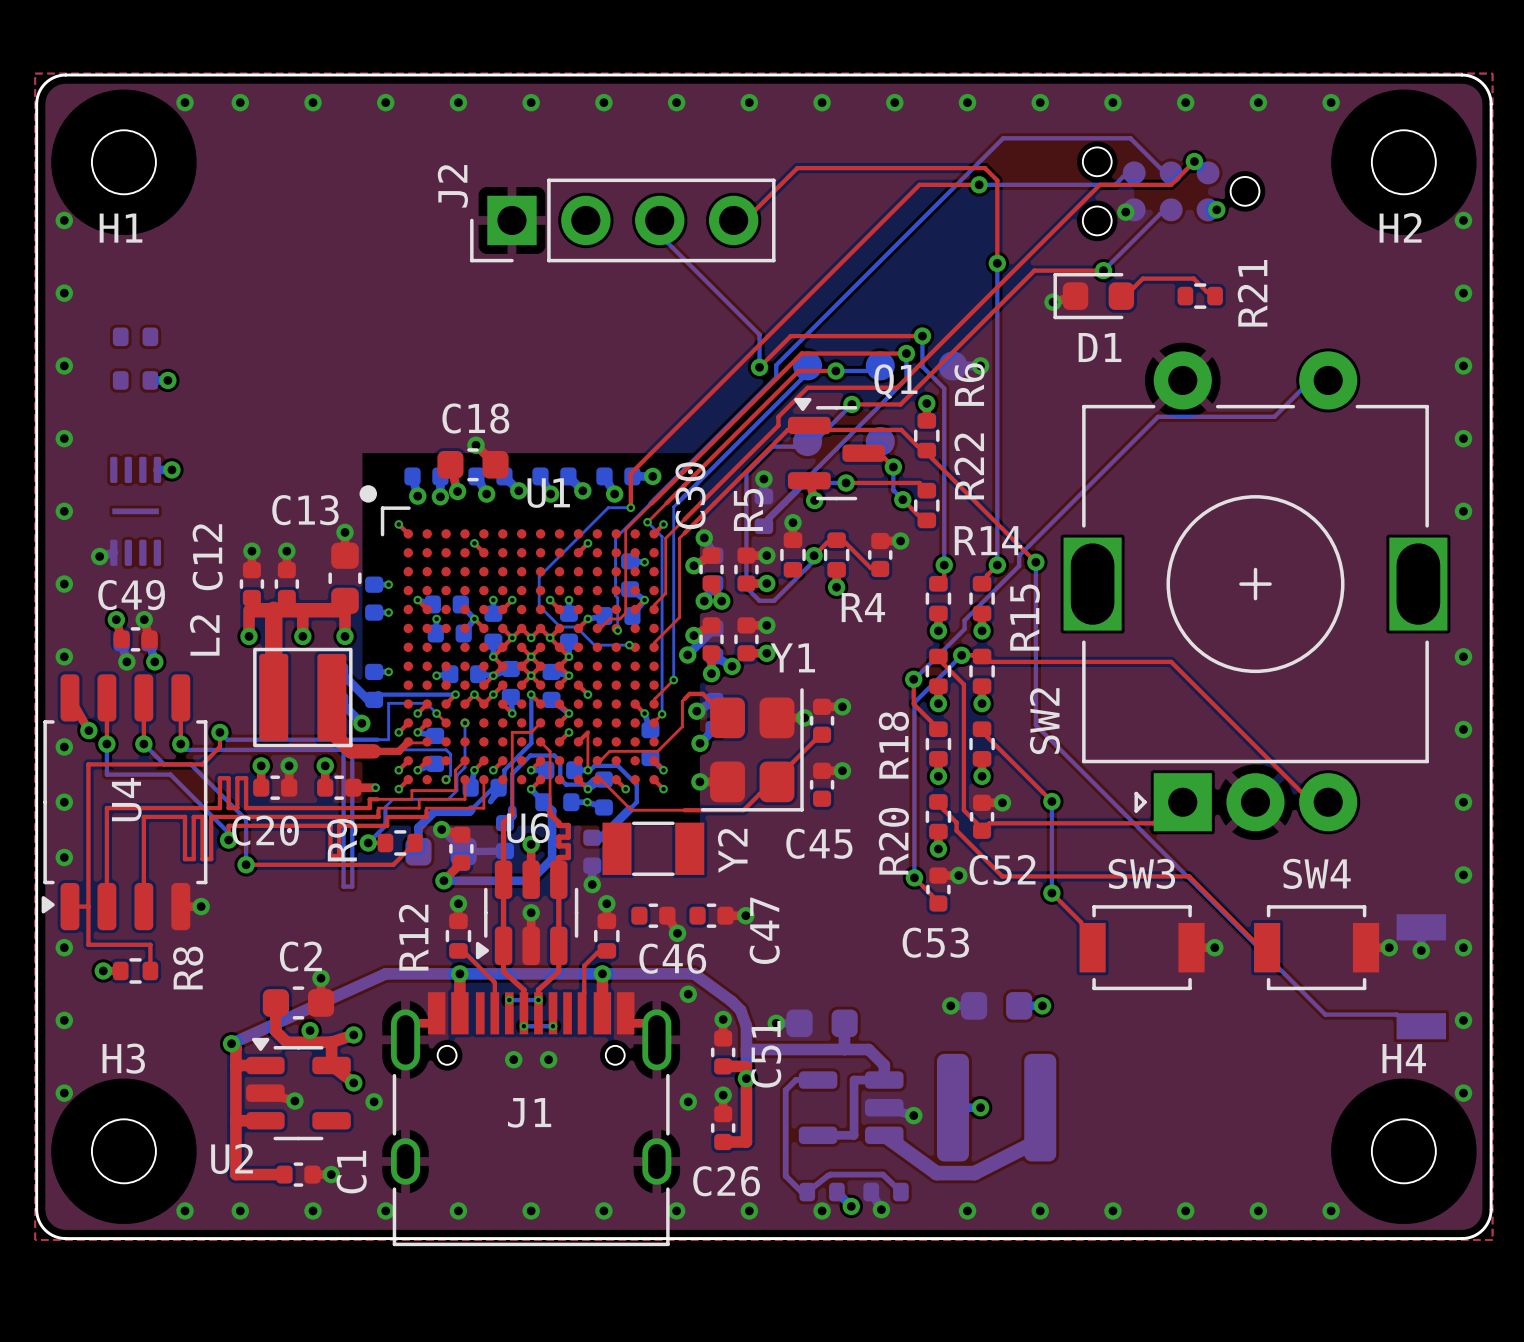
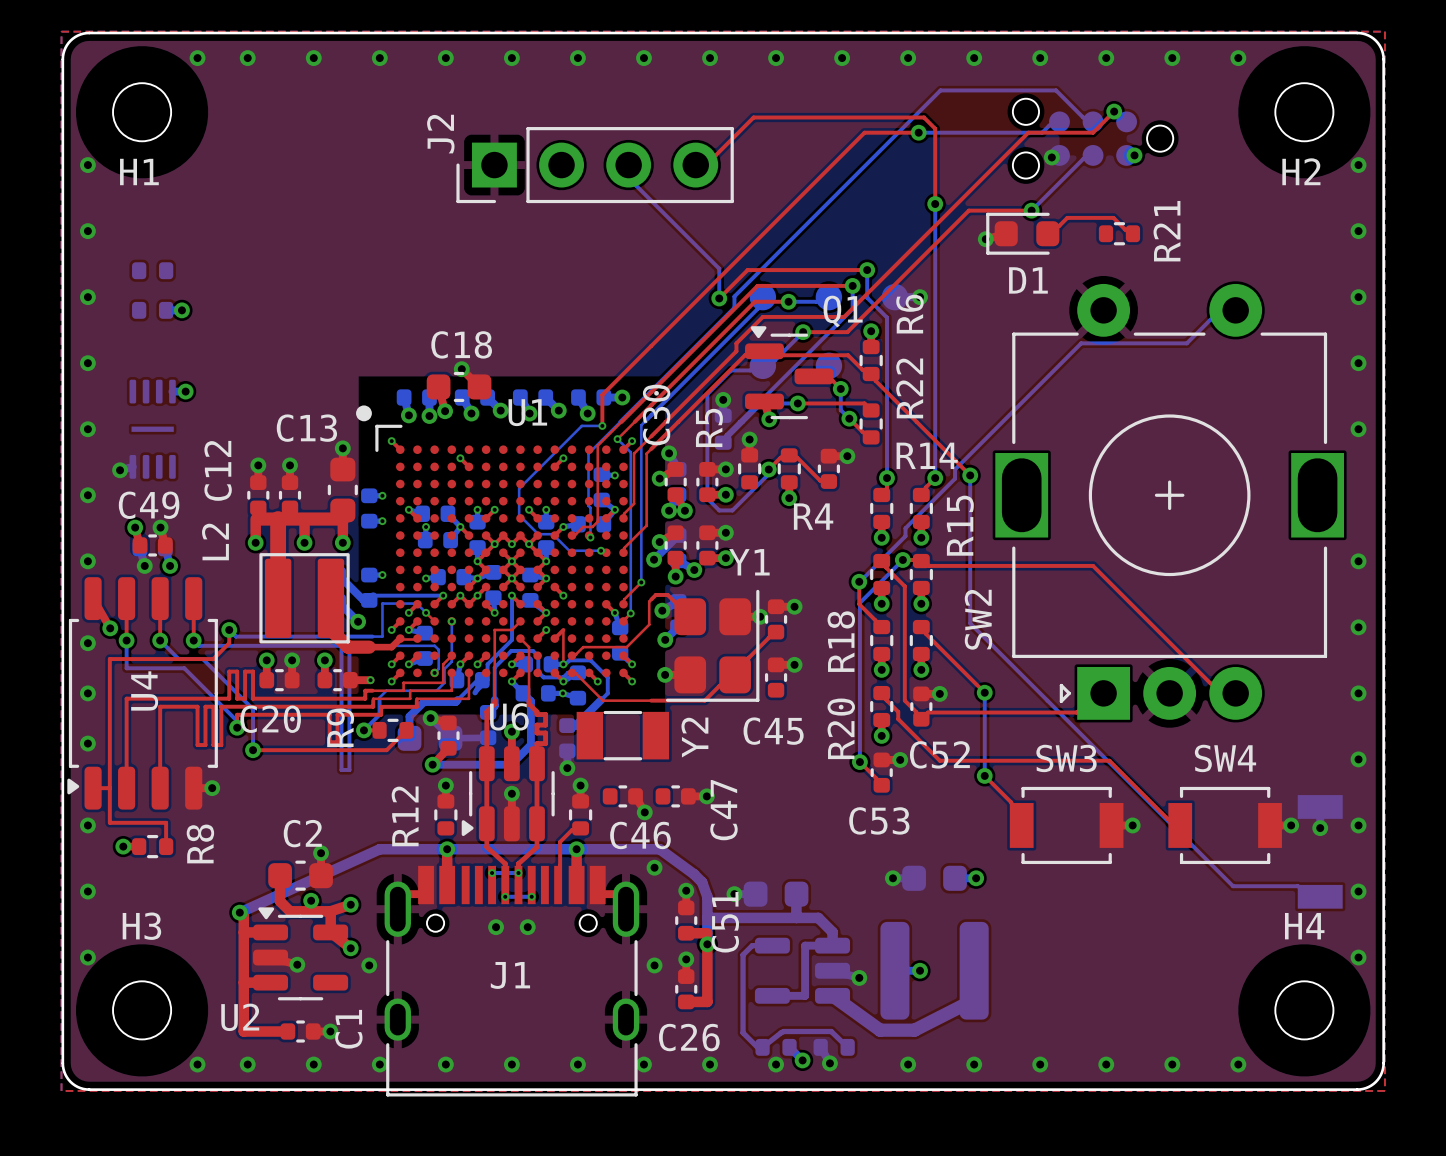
top track: (458, 950) (463, 950) (494, 982) (494, 1013) -> none

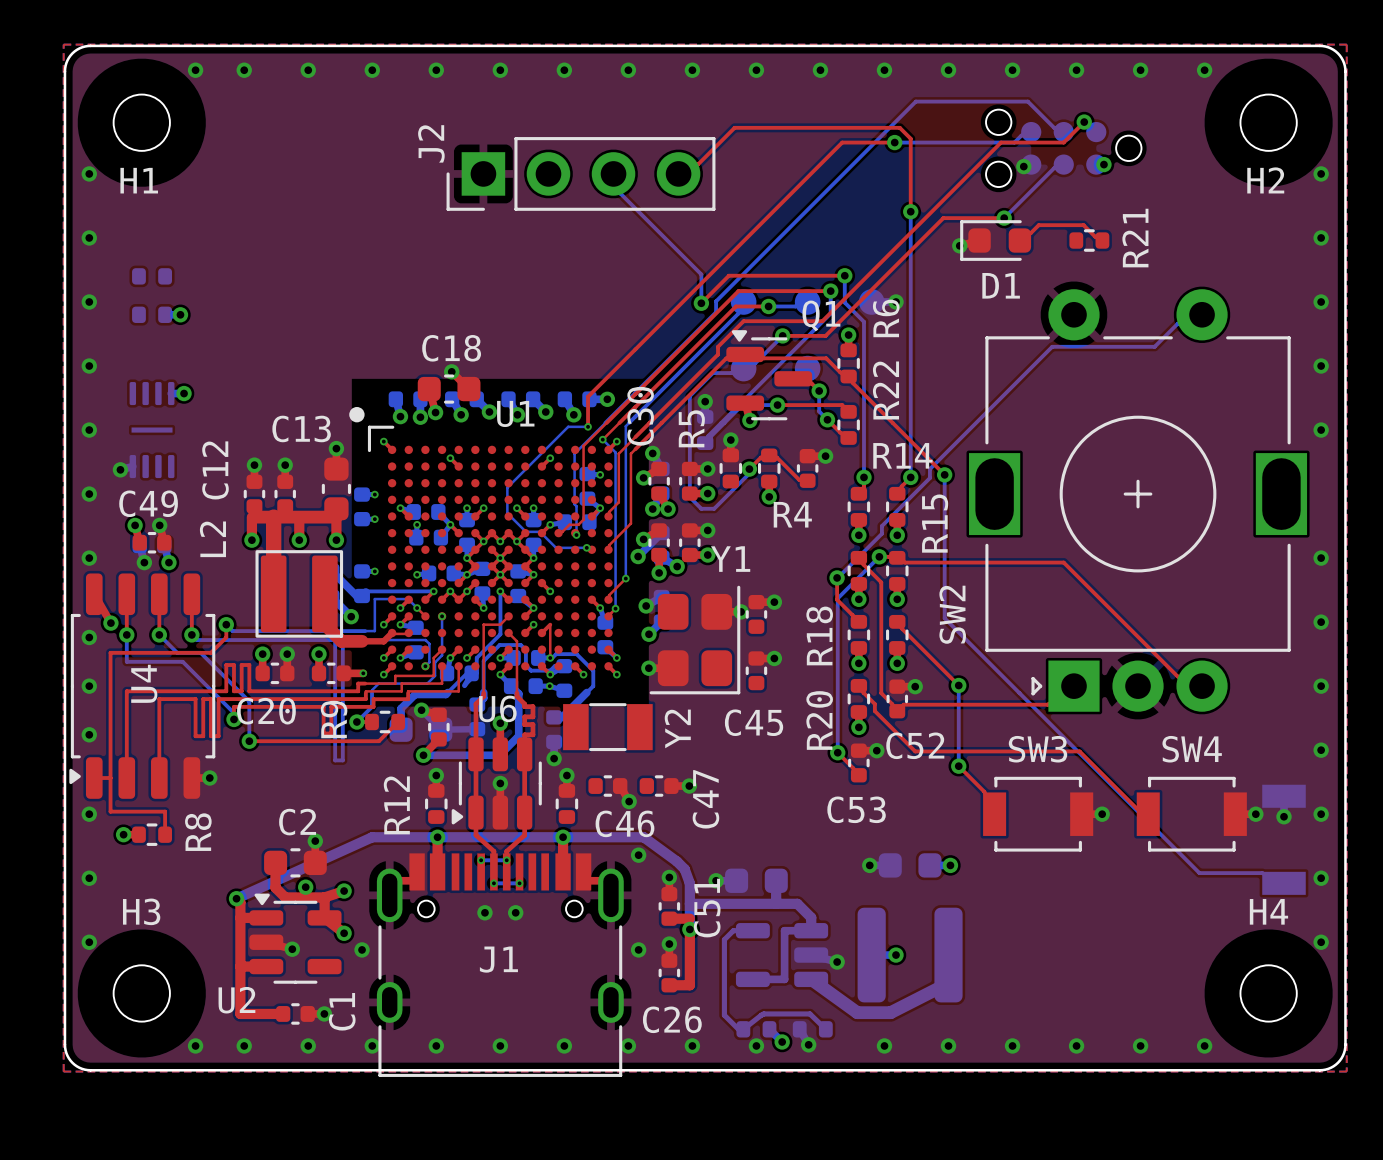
top track: (690, 616) (667, 594) (655, 594) (649, 601) (649, 624) (626, 647) (583, 647) (571, 655) -> none
top track: (776, 632) (748, 657) (735, 674) (719, 686) (704, 700) (603, 700) (575, 673) (571, 672) -> none
top track: (580, 828) (571, 830) (560, 841) (558, 885) -> none

